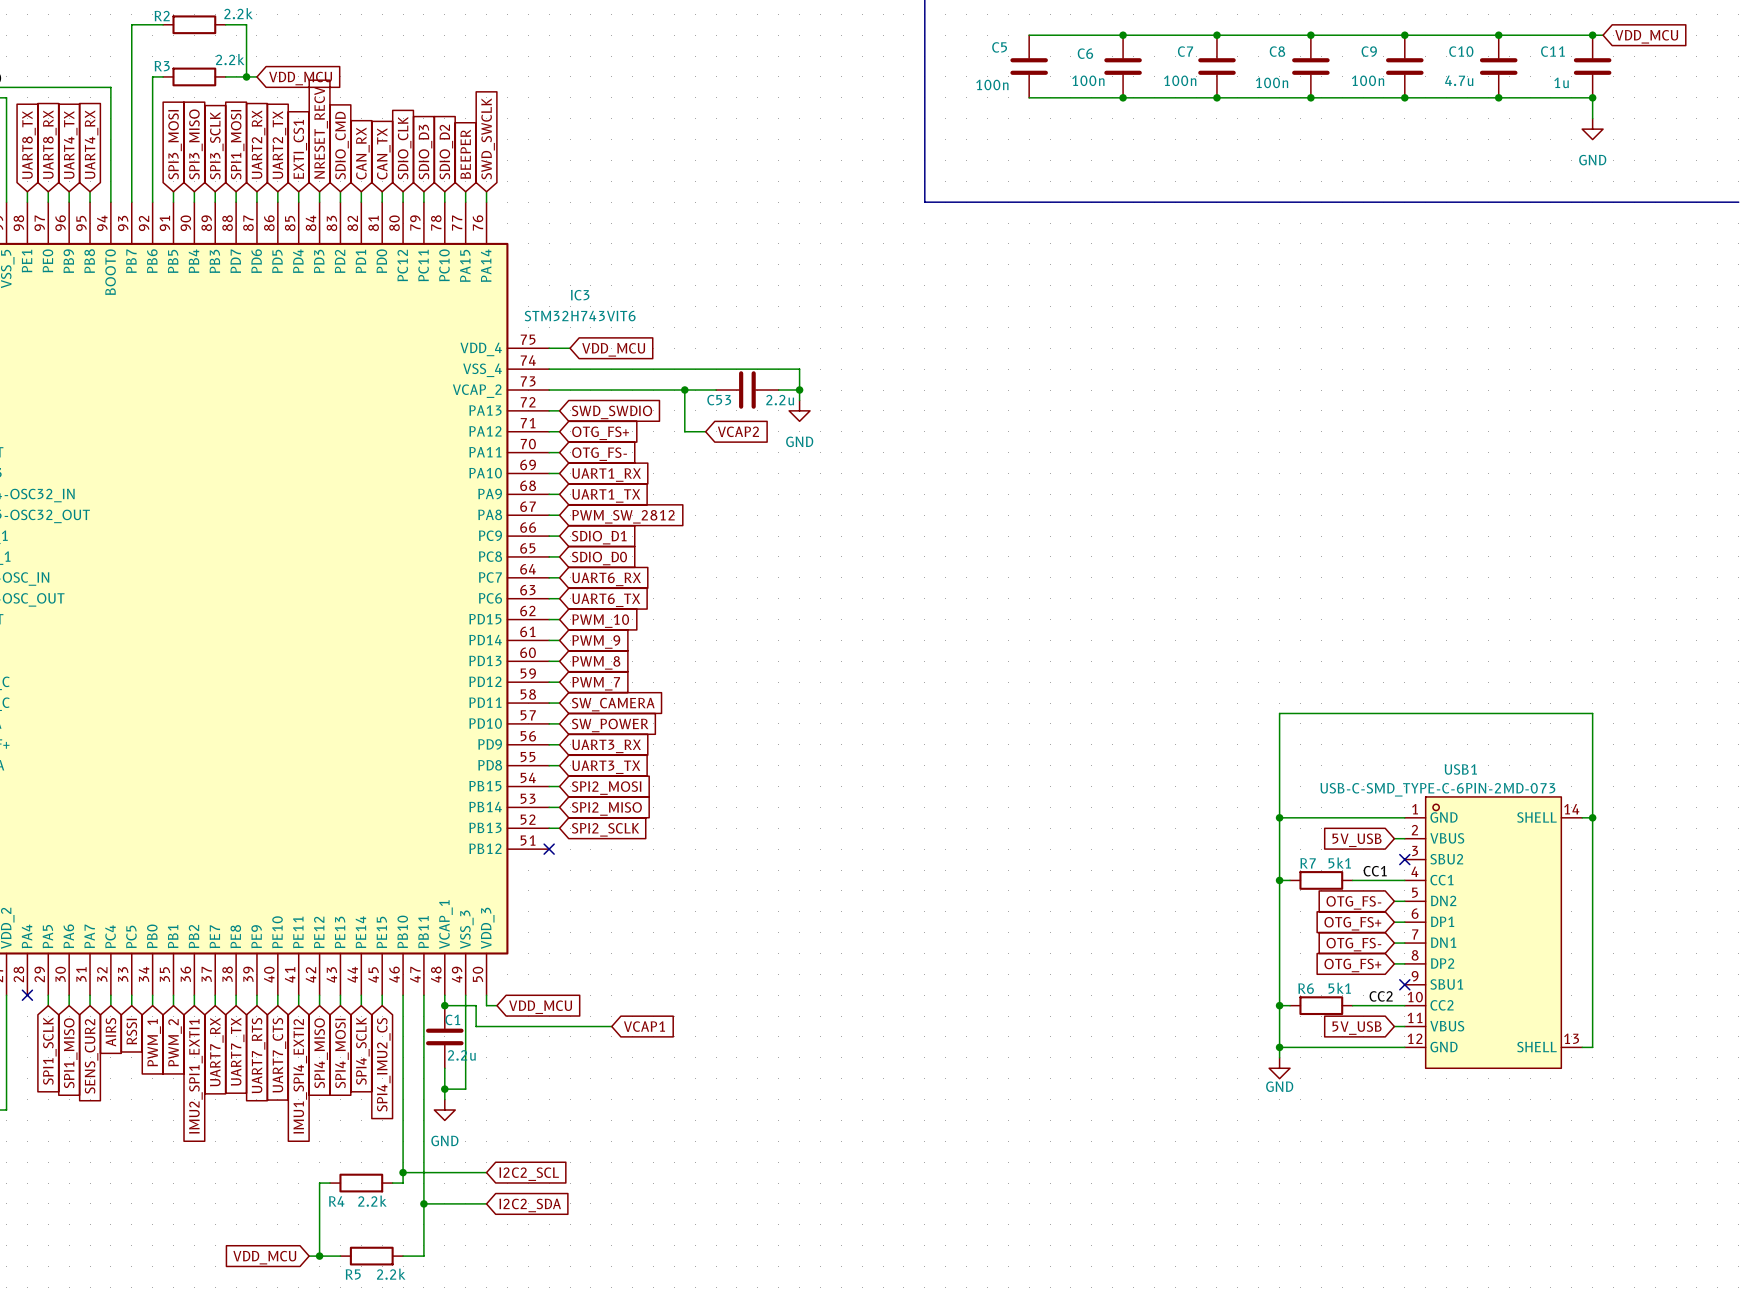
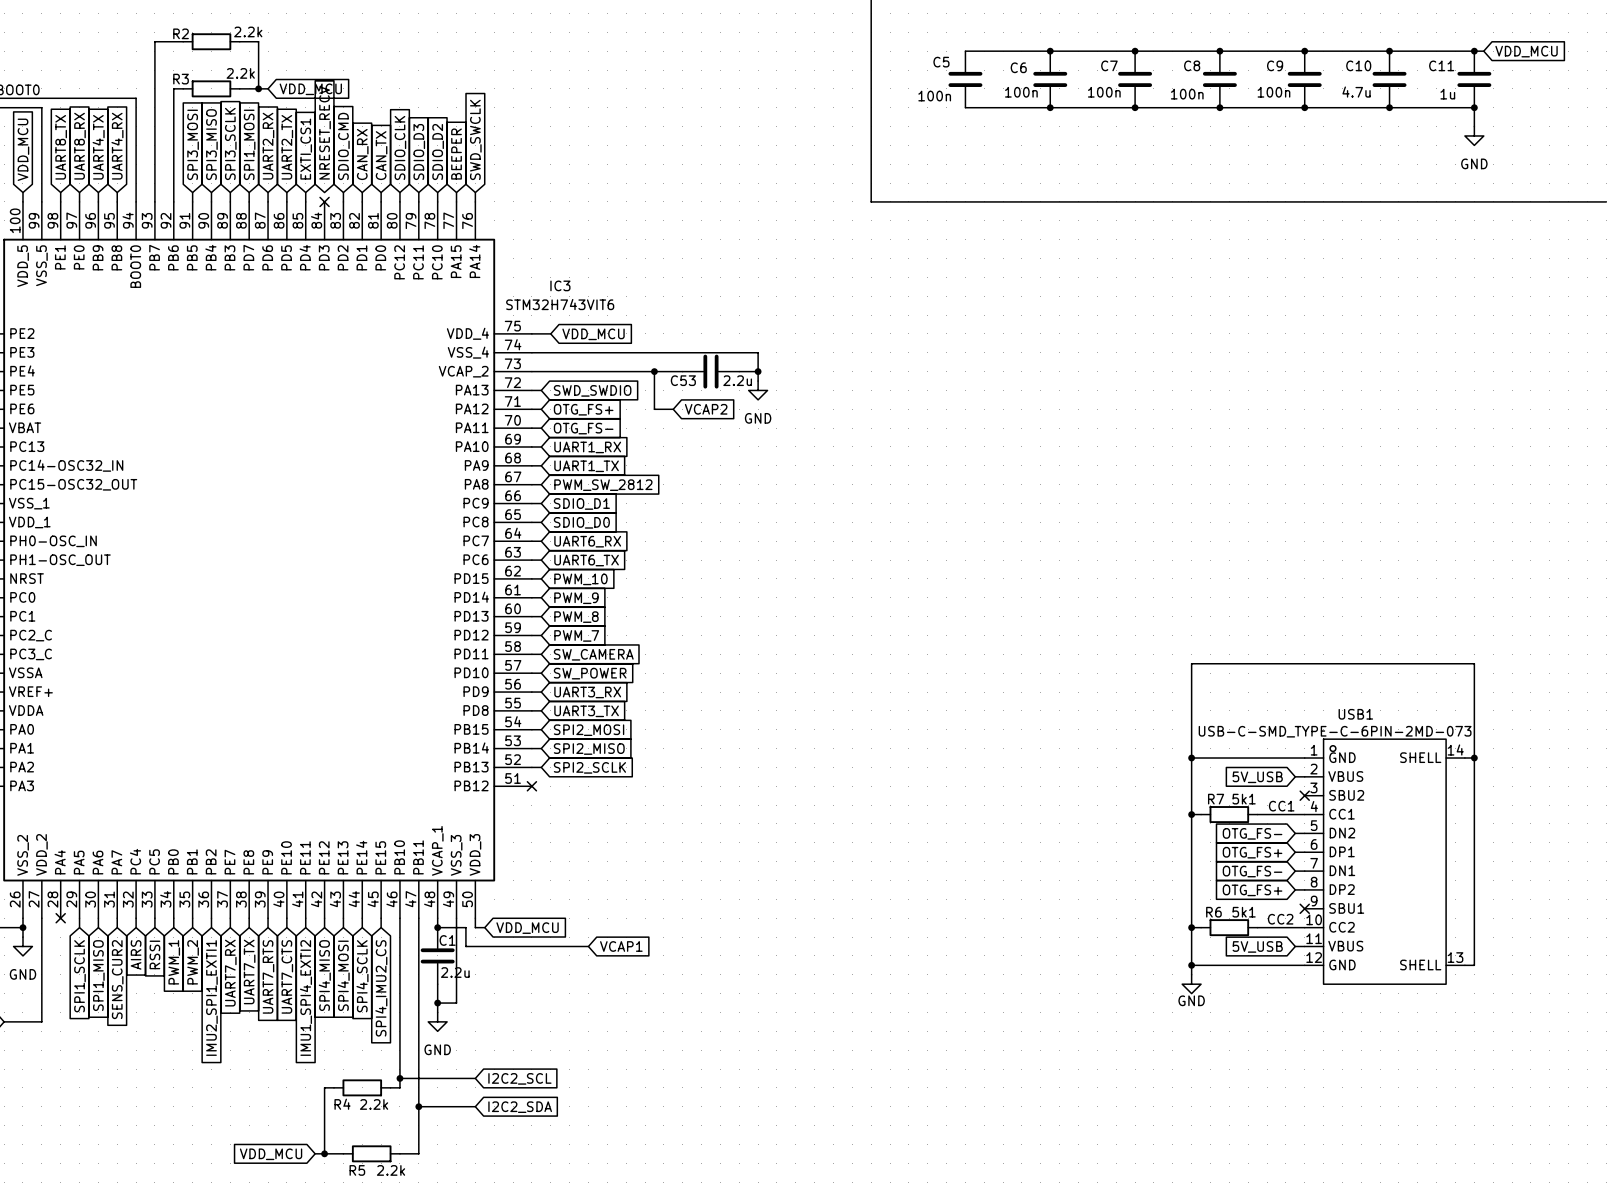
wire: (319, 191) (319, 202) -> none
no-connect mark: none -> (324, 201)

